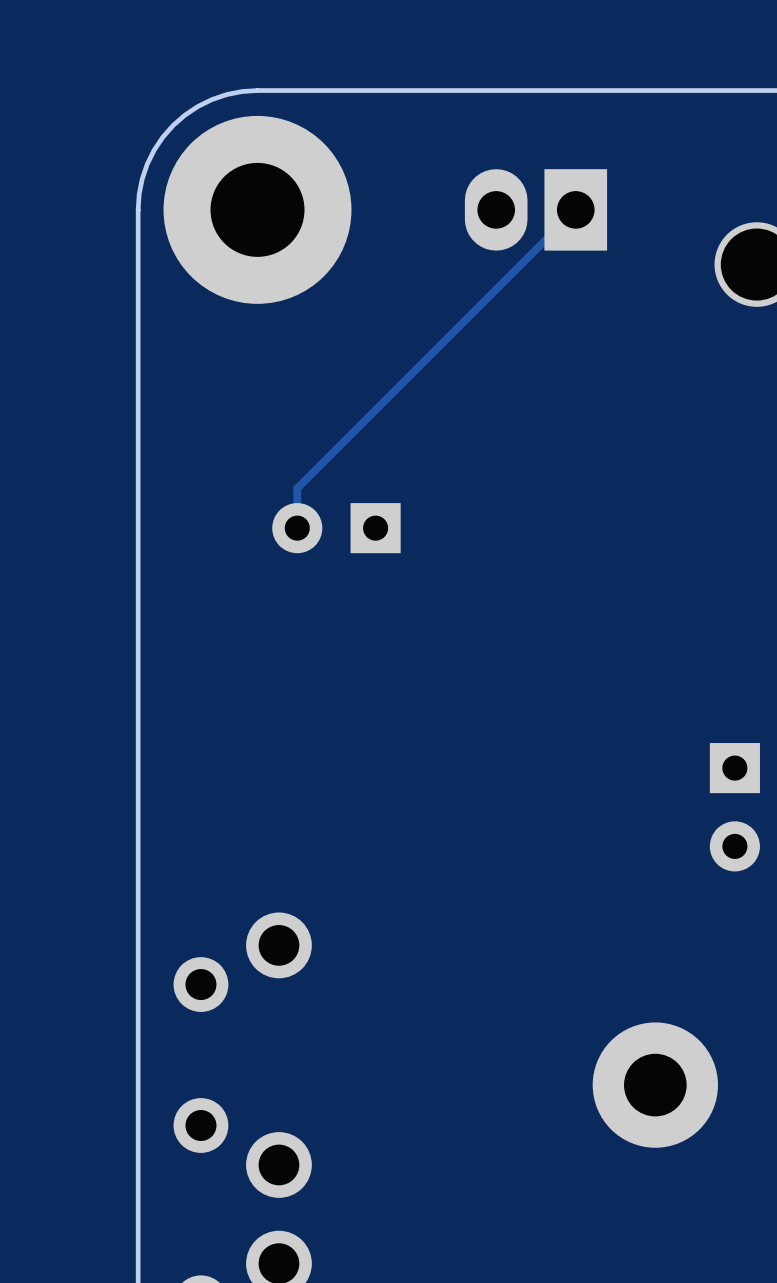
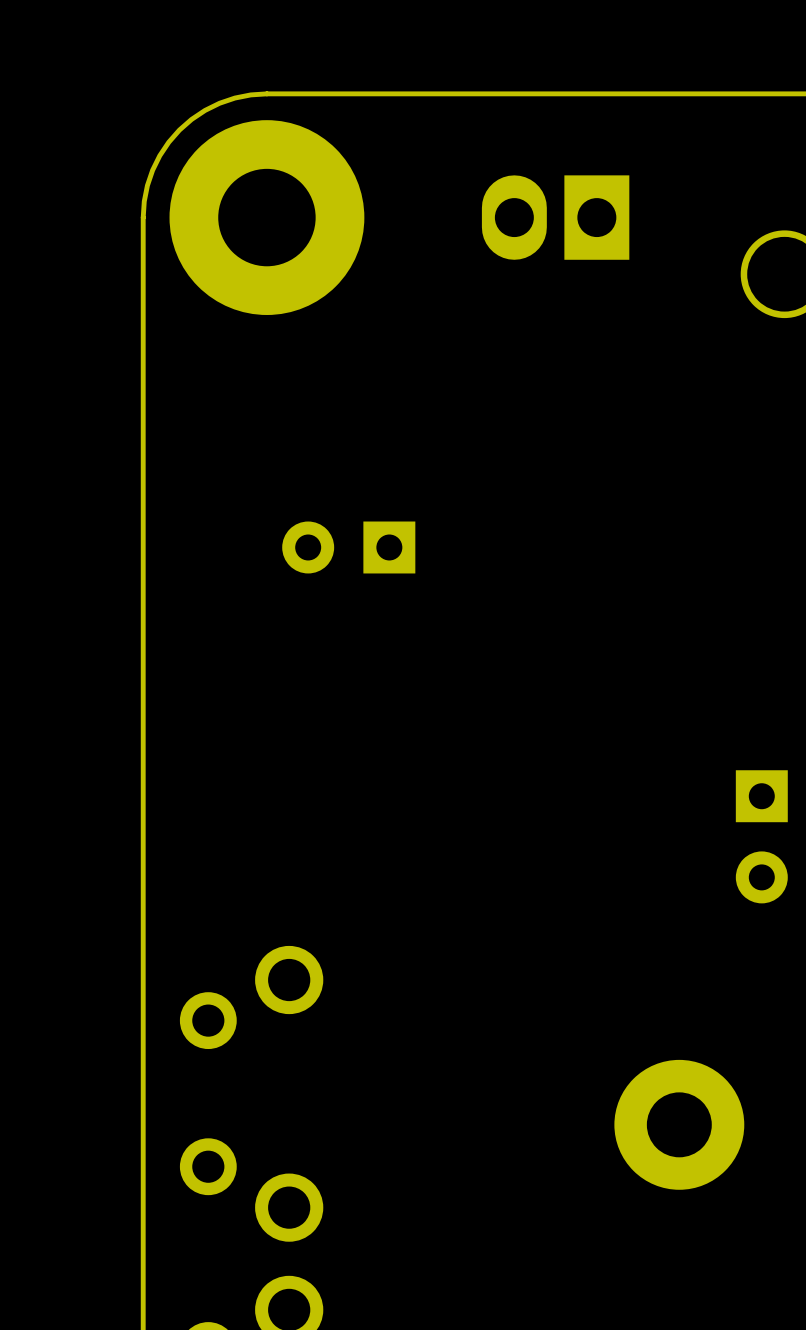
track: (575, 209) (297, 488) (297, 528) -> none

